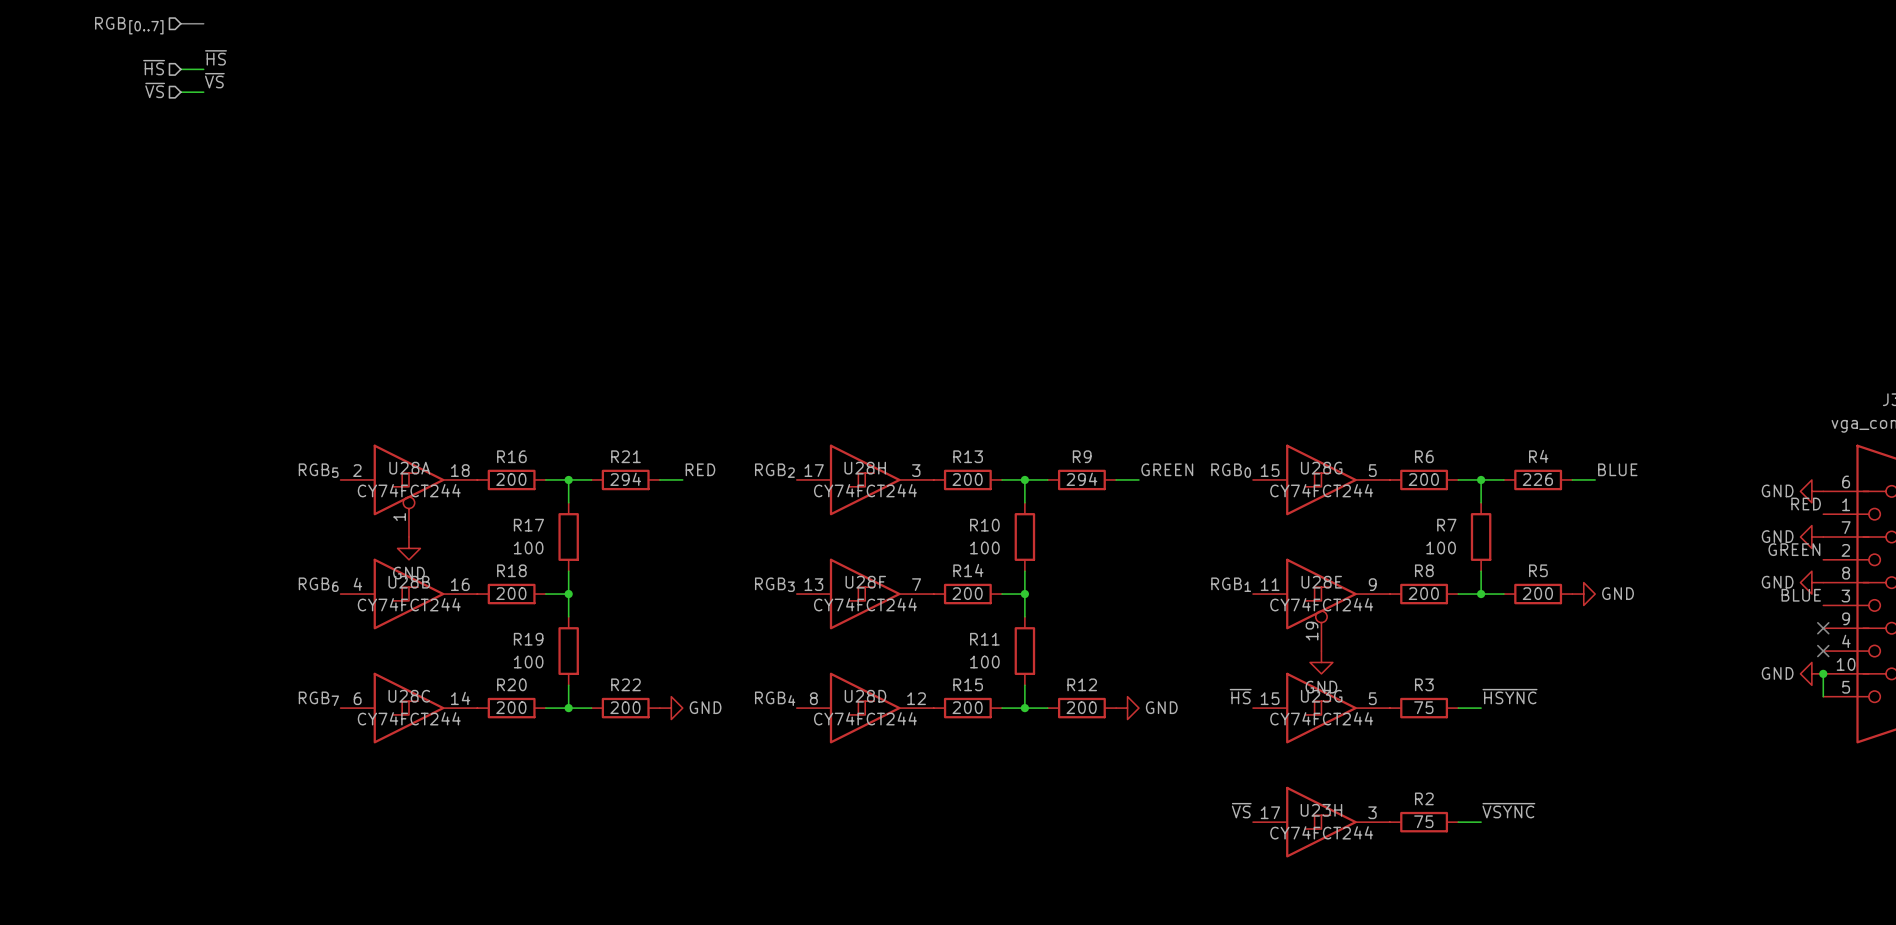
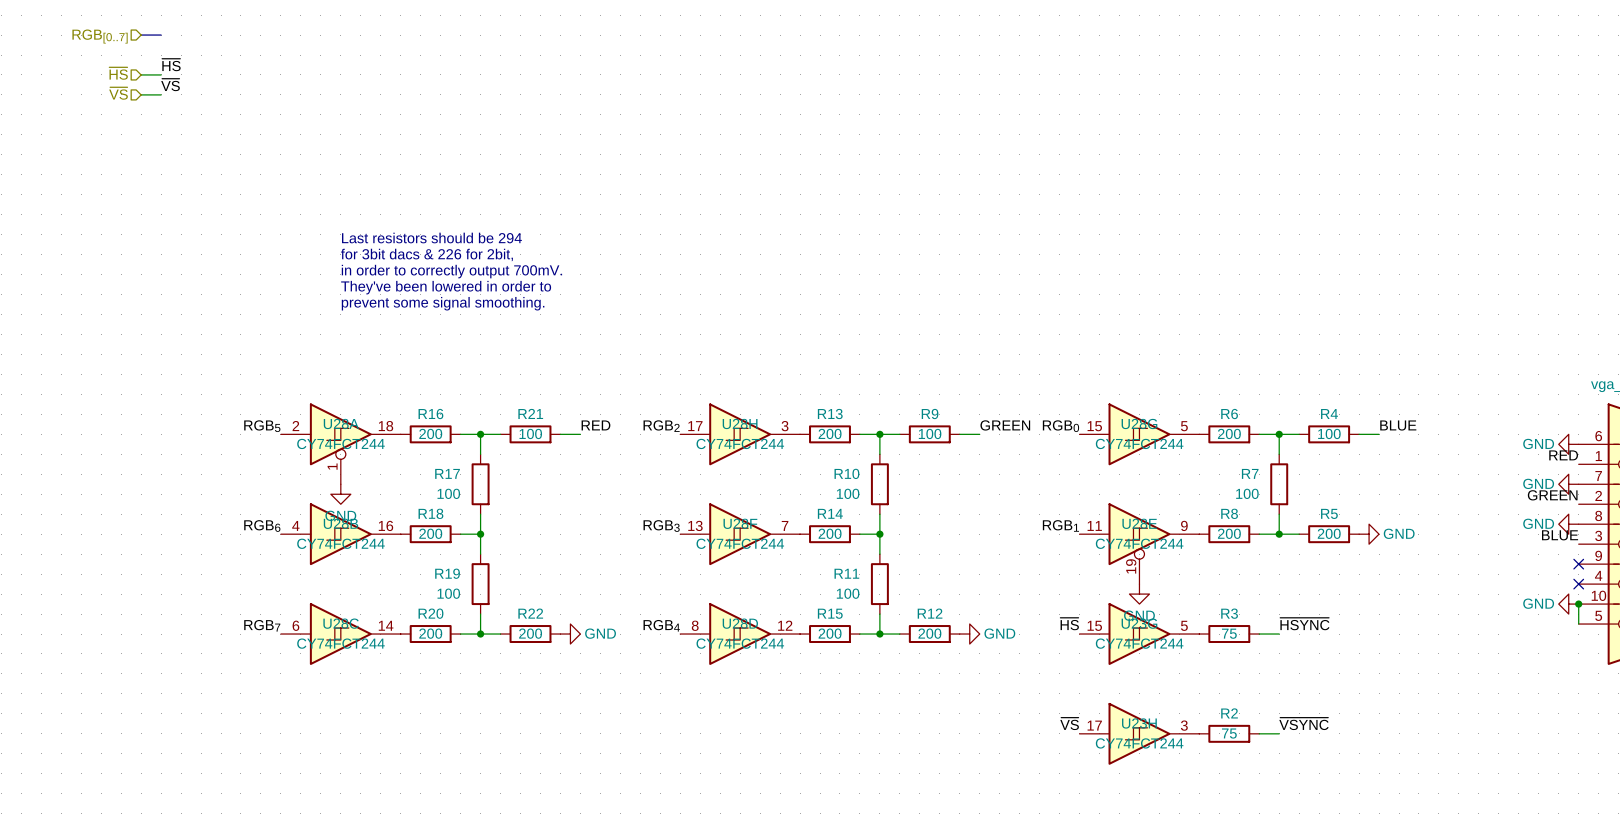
text: none -> Last resistors should be 294 (431, 238)
text: none -> for 3bit dacs & 226 for 2bit, (426, 254)
text: none -> in order to correctly output 700mV. (451, 271)
text: none -> They've been lowered in order to (446, 287)
text: none -> prevent some signal smoothing. (443, 303)
R21 value: 294 (625, 479) -> 100 (530, 433)
R9 value: 294 (1081, 479) -> 100 (930, 433)
R4 value: 226 (1537, 479) -> 100 (1329, 433)

